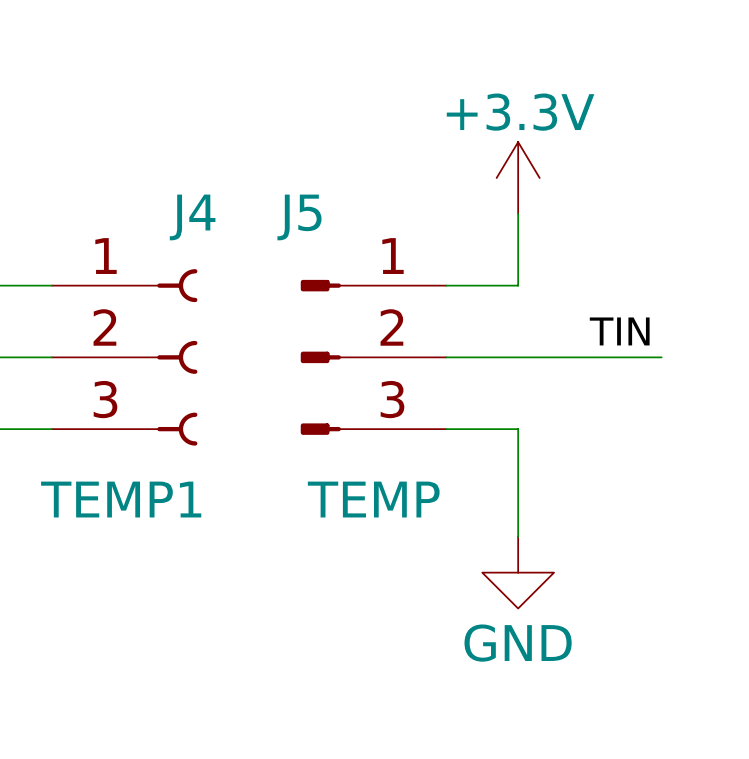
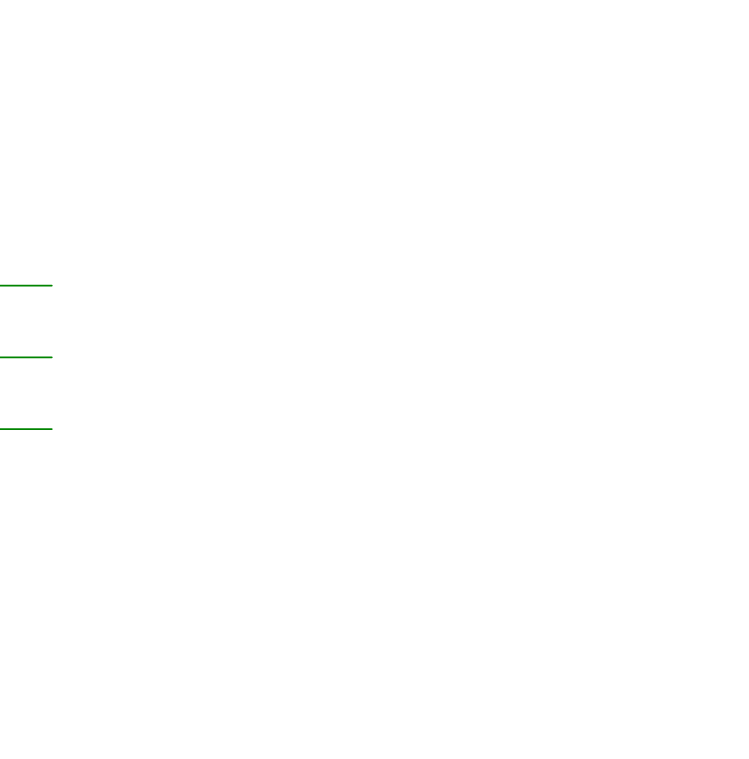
power symbol: +3.3V (518, 178) -> none
wire: (518, 213) (518, 285) (446, 285) -> none
label: TIN (619, 331) -> none
J4: TEMP1 (124, 357) -> none
J5: TEMP (373, 357) -> none
wire: (446, 357) (661, 357) -> none
wire: (446, 429) (518, 429) (518, 536) -> none
power symbol: GND (518, 572) -> none

